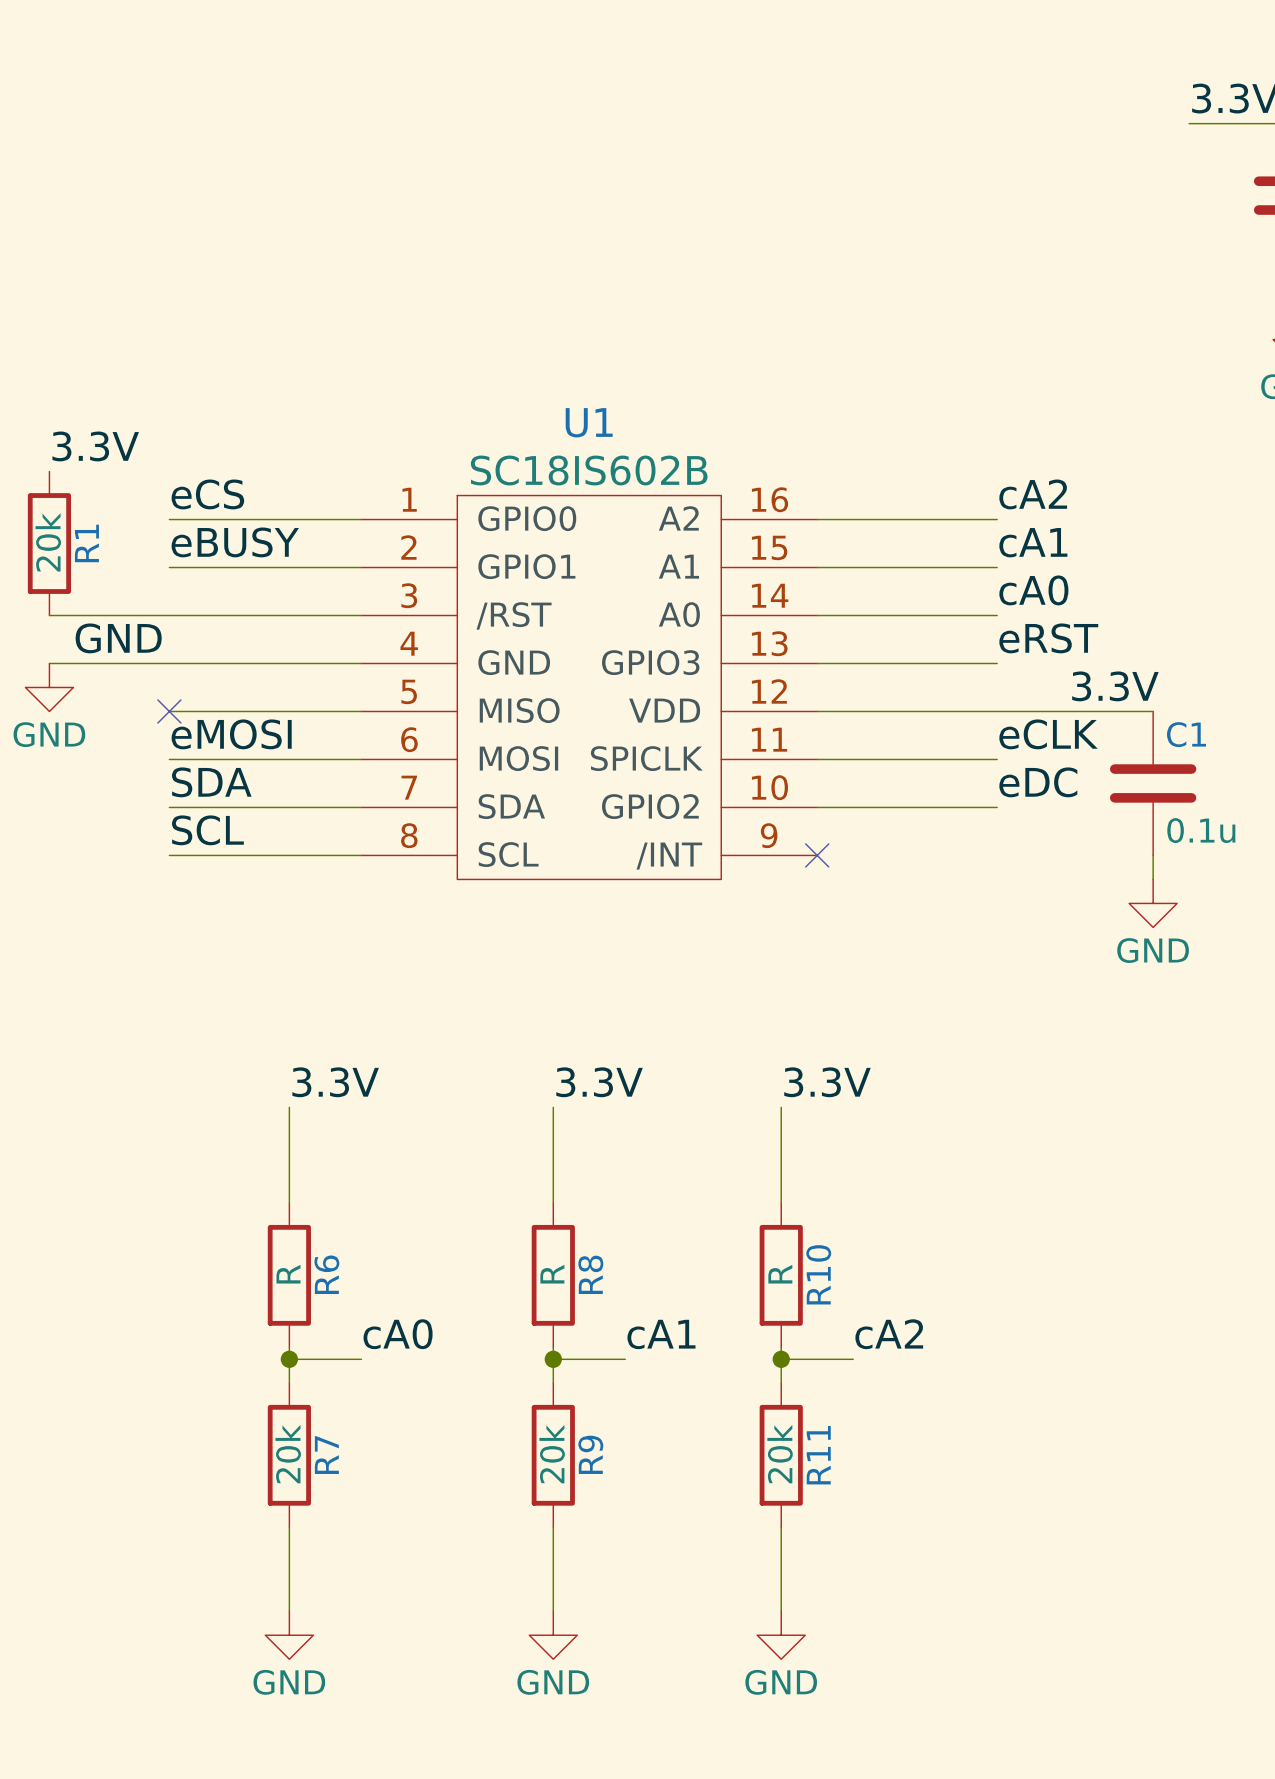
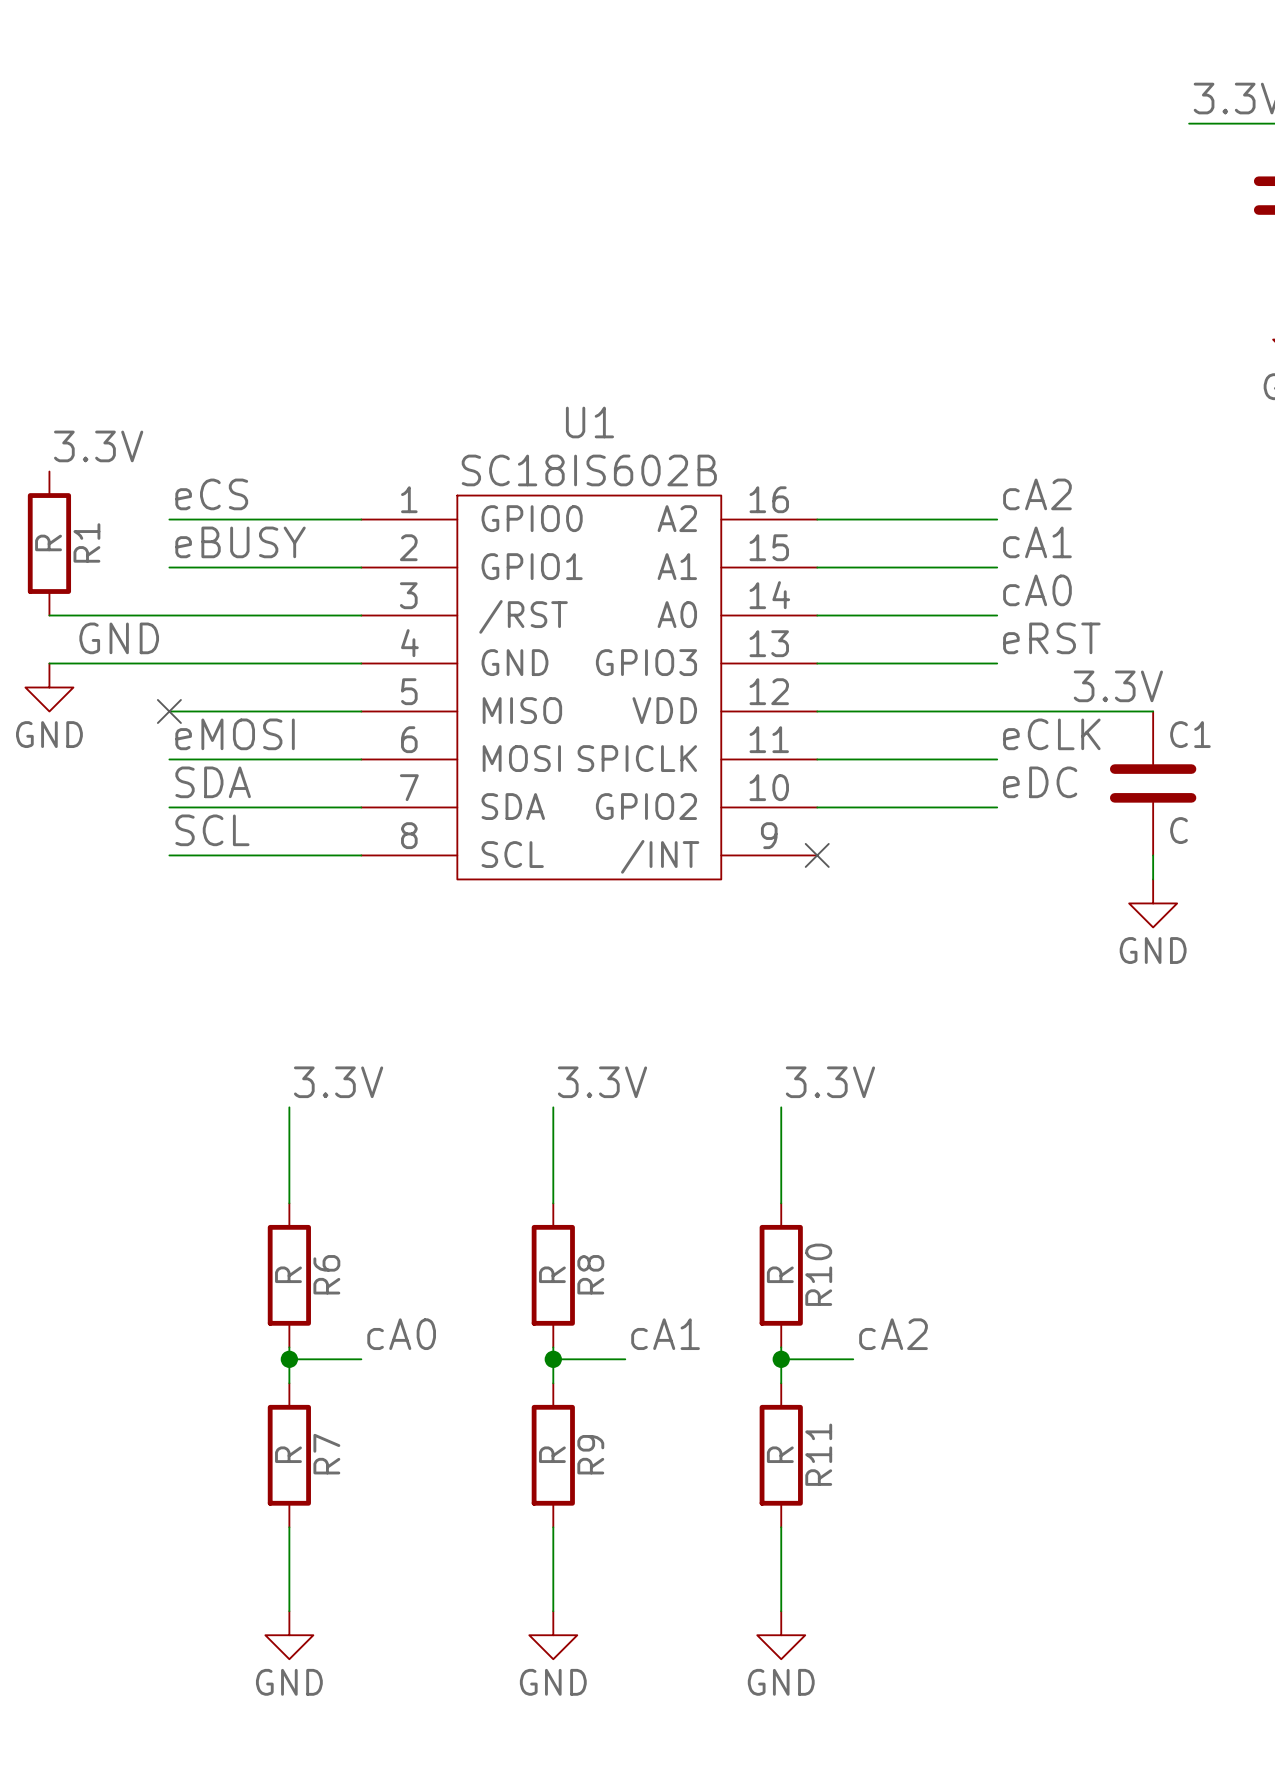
R1 value: 20k (48, 542) -> R (48, 542)
C1 value: 0.1u (1201, 830) -> C (1179, 830)
R7 value: 20k (288, 1454) -> R (288, 1454)
R9 value: 20k (552, 1454) -> R (552, 1454)
R11 value: 20k (780, 1454) -> R (780, 1454)

